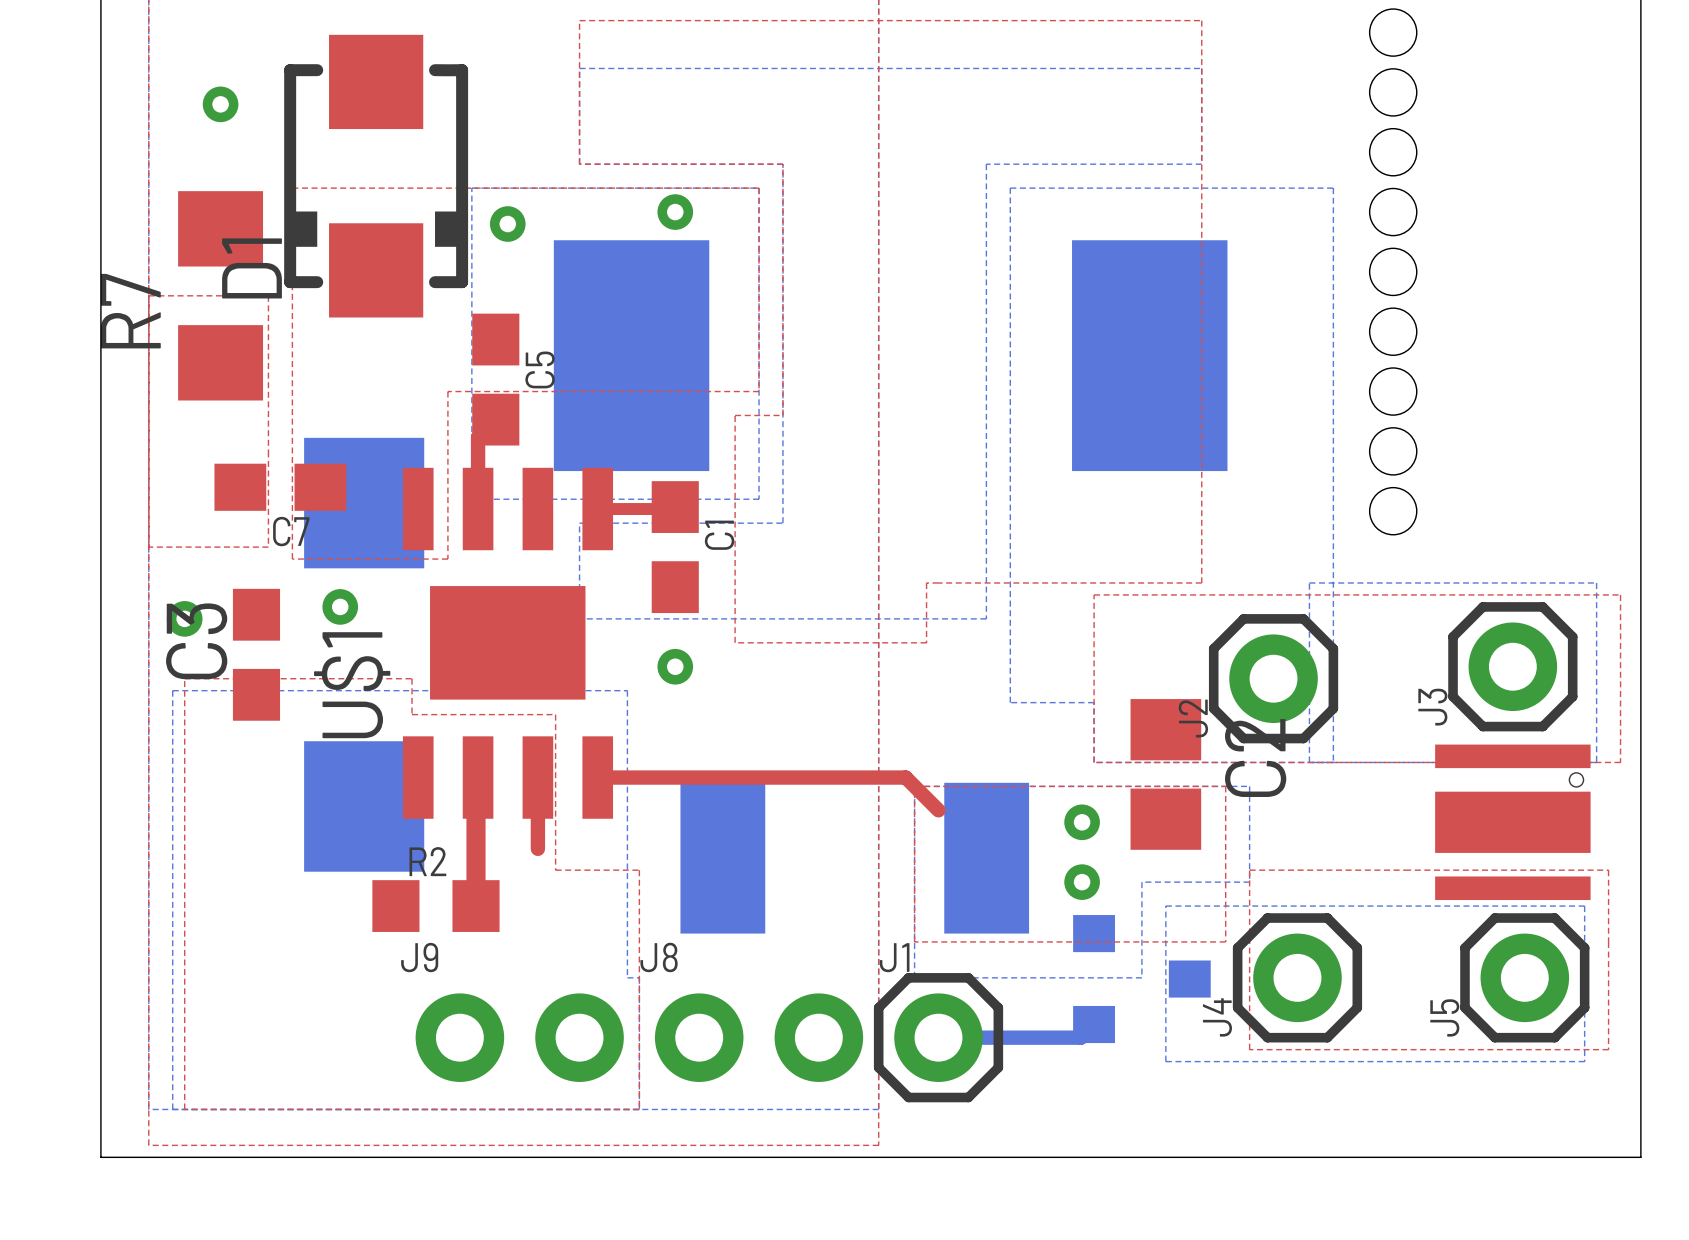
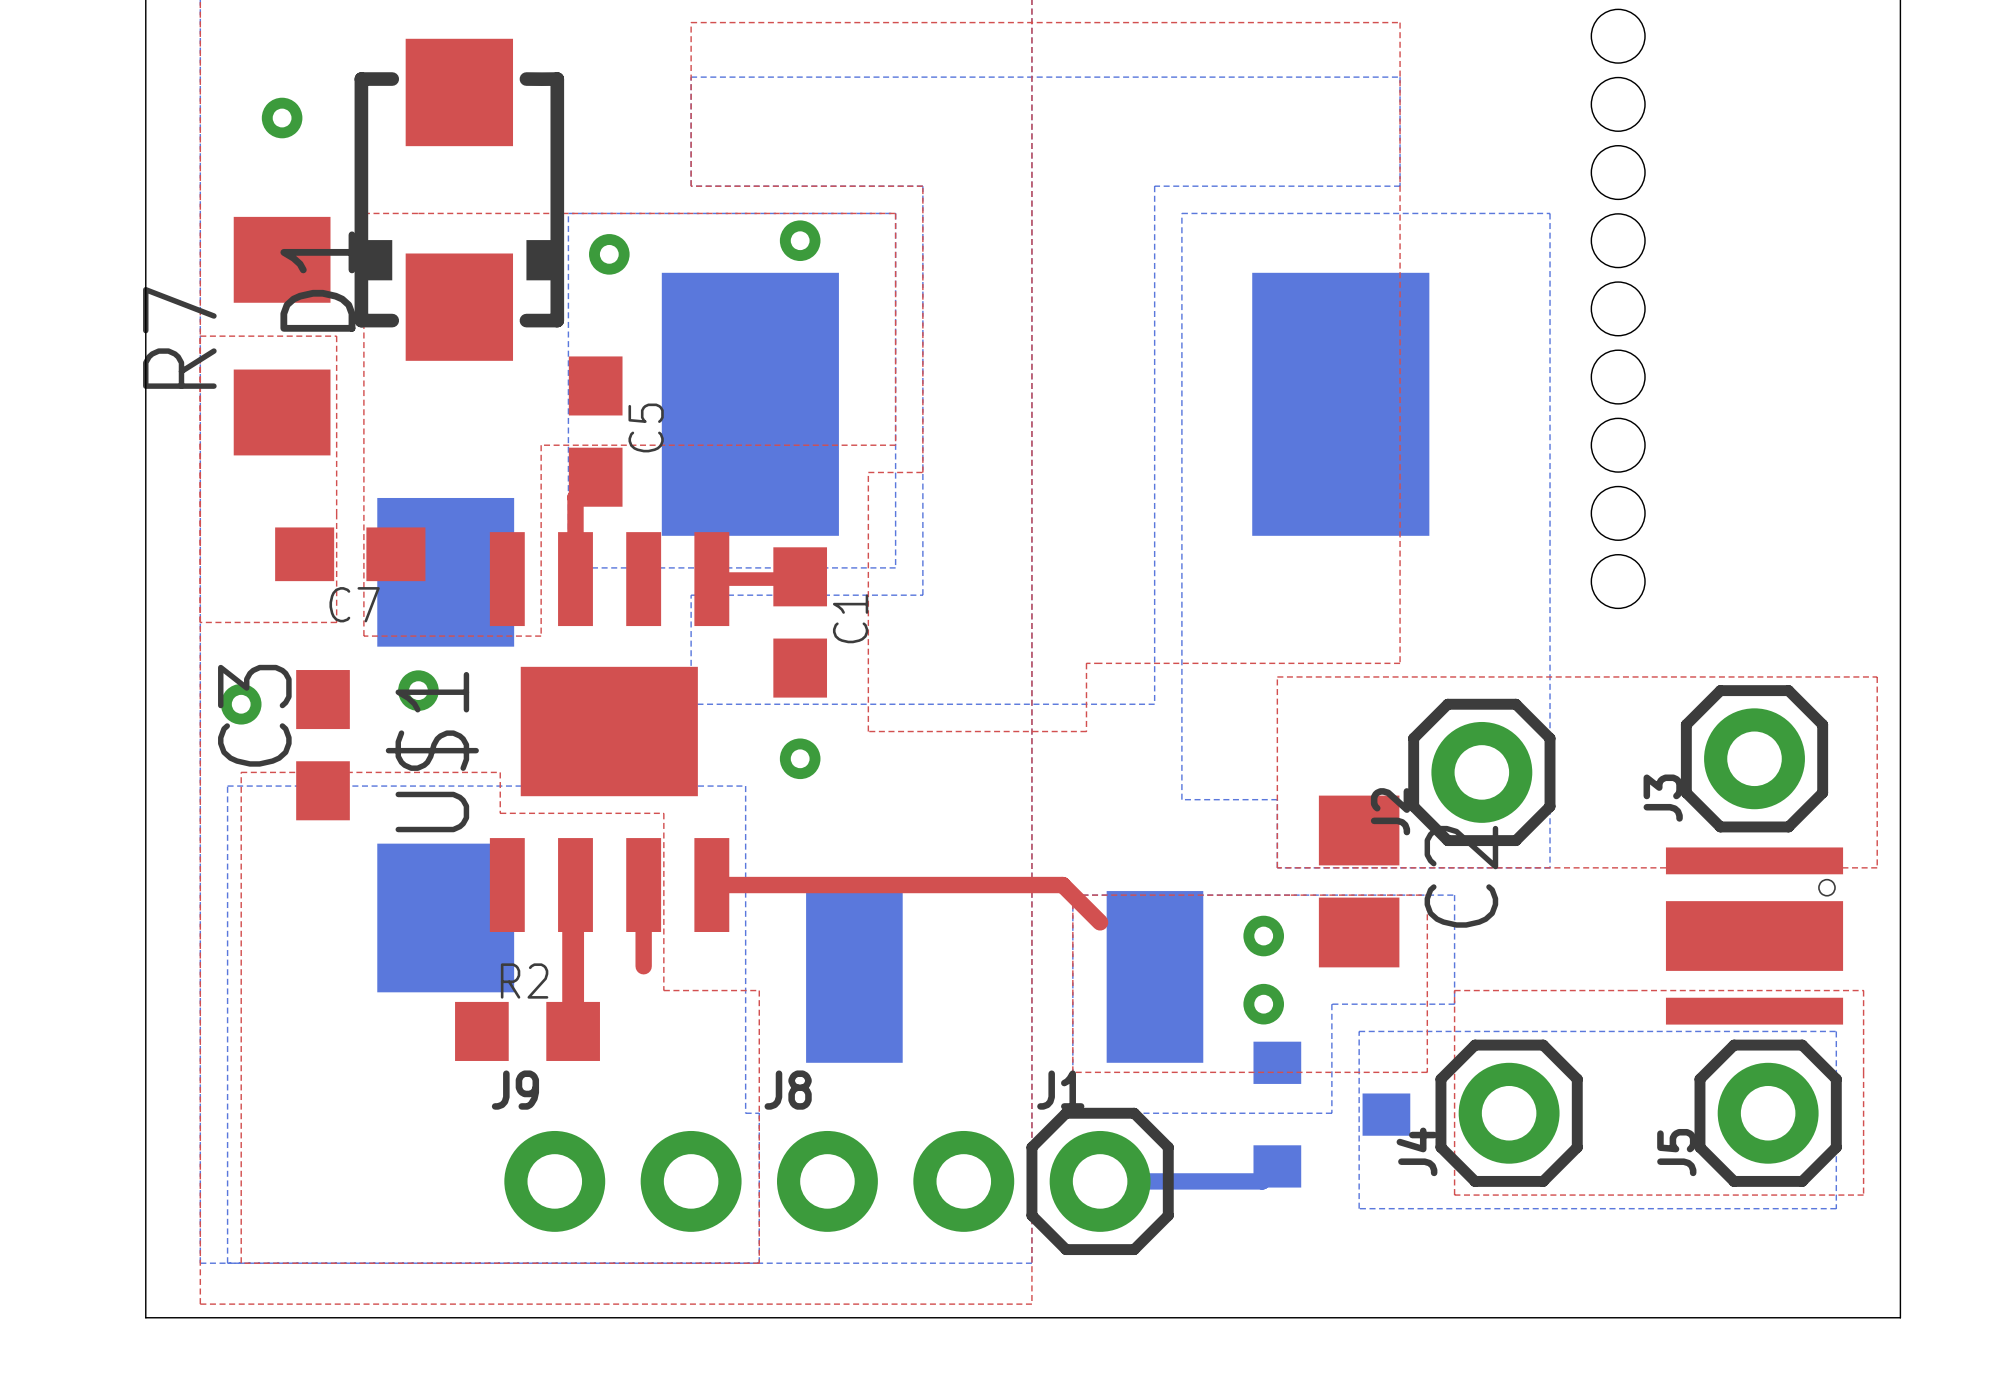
bottom zone outline: (1309, 762) (1309, 582) (1596, 582) (1596, 762) (1333, 762) -> none

